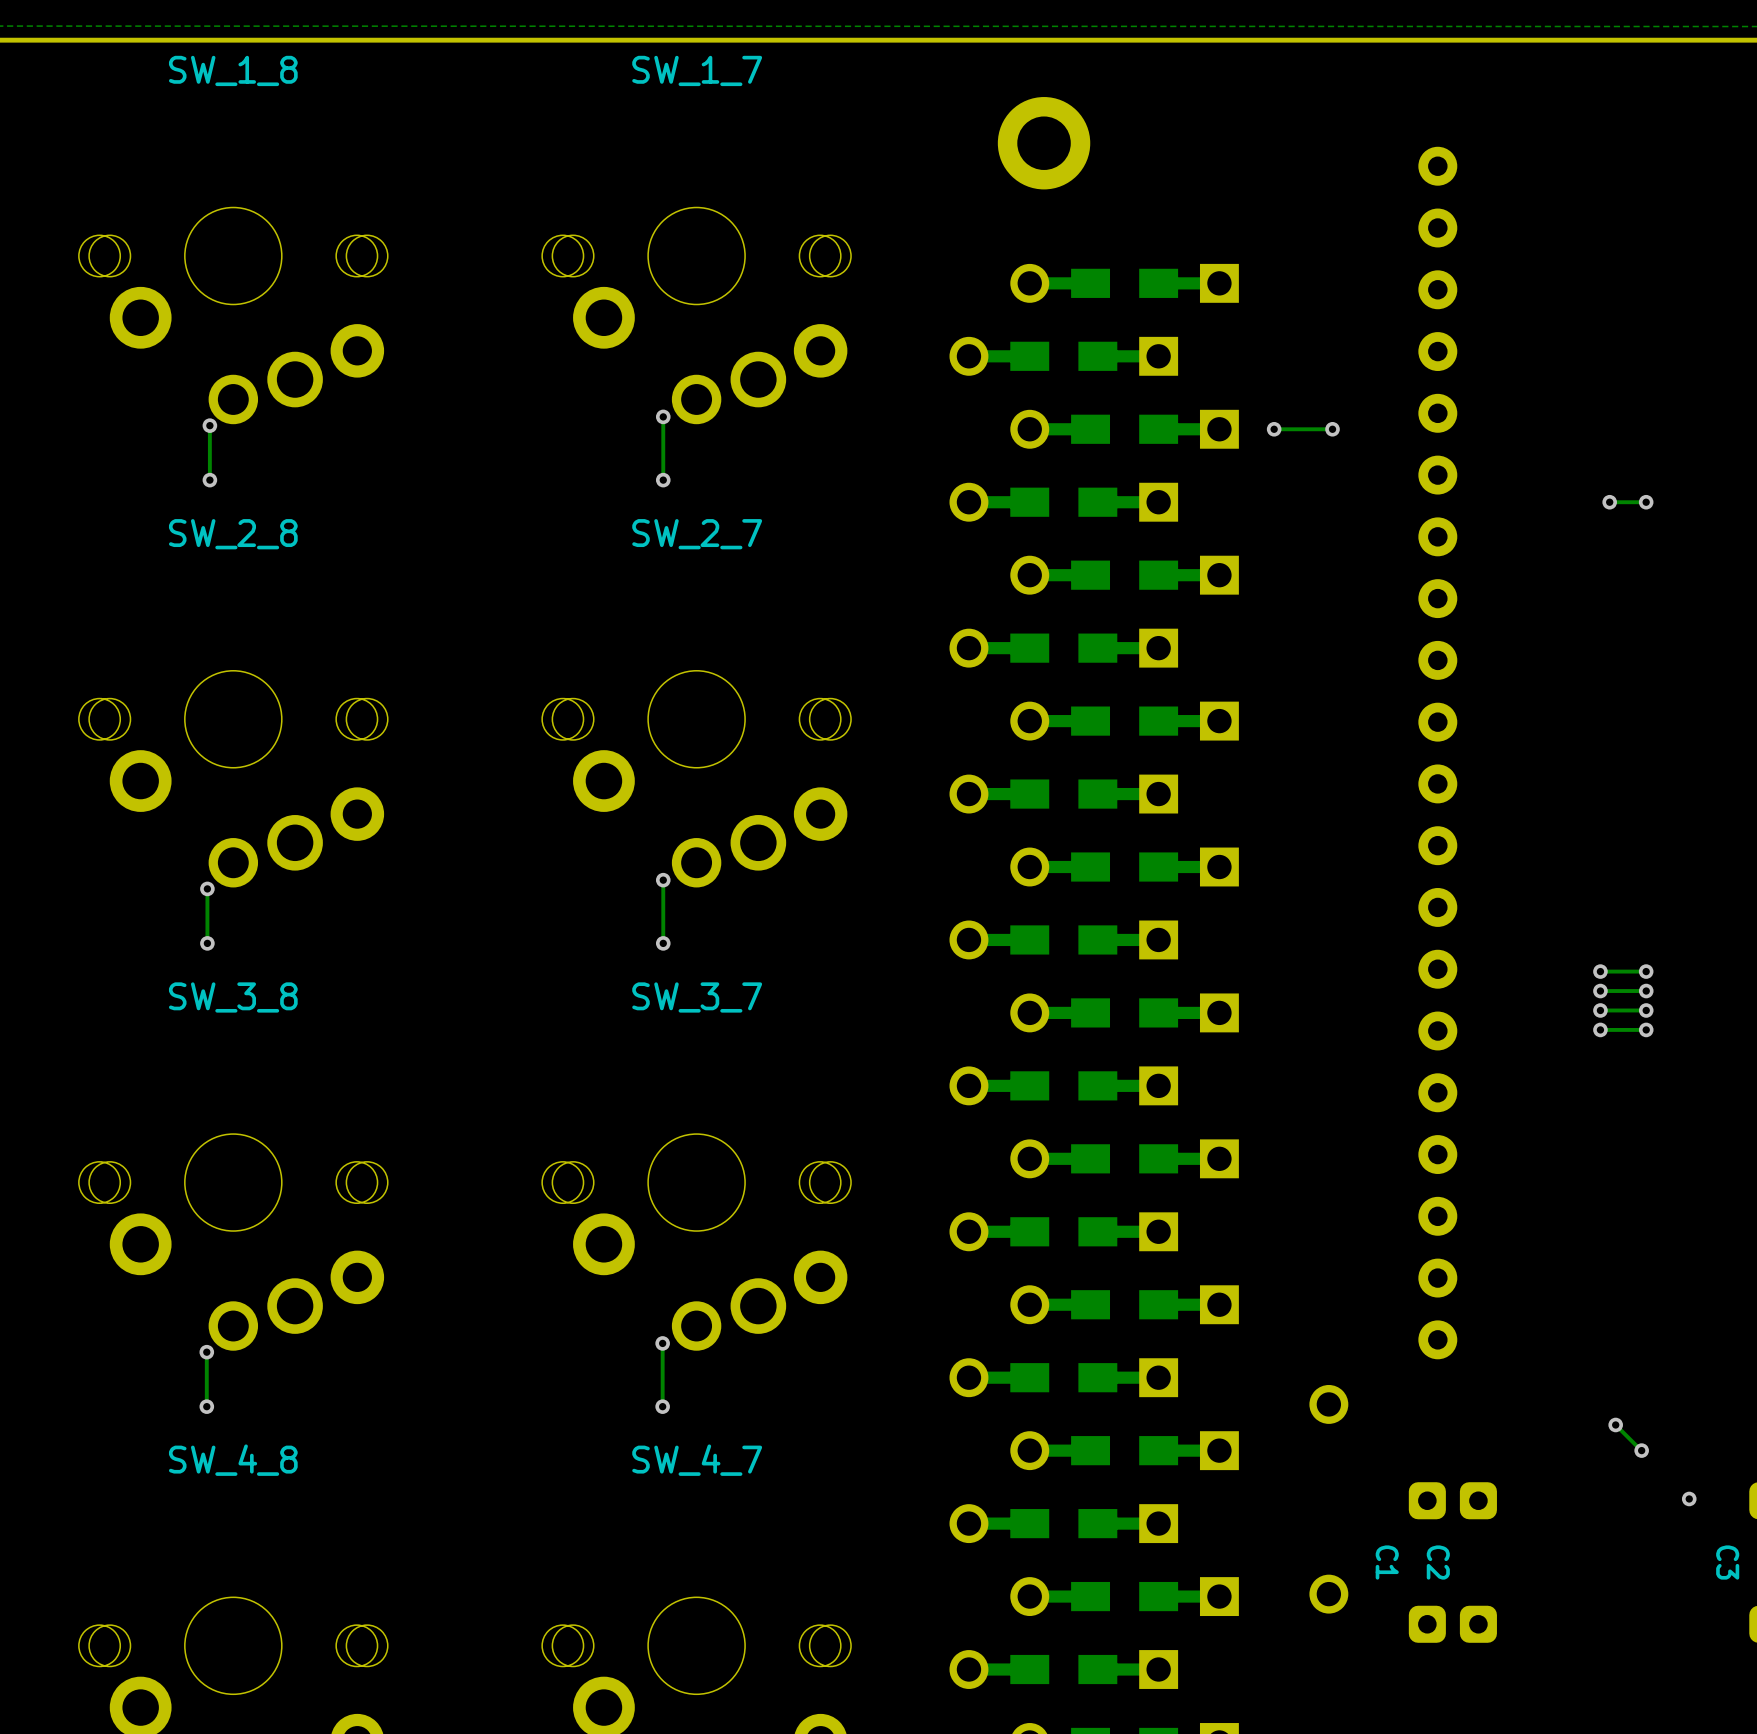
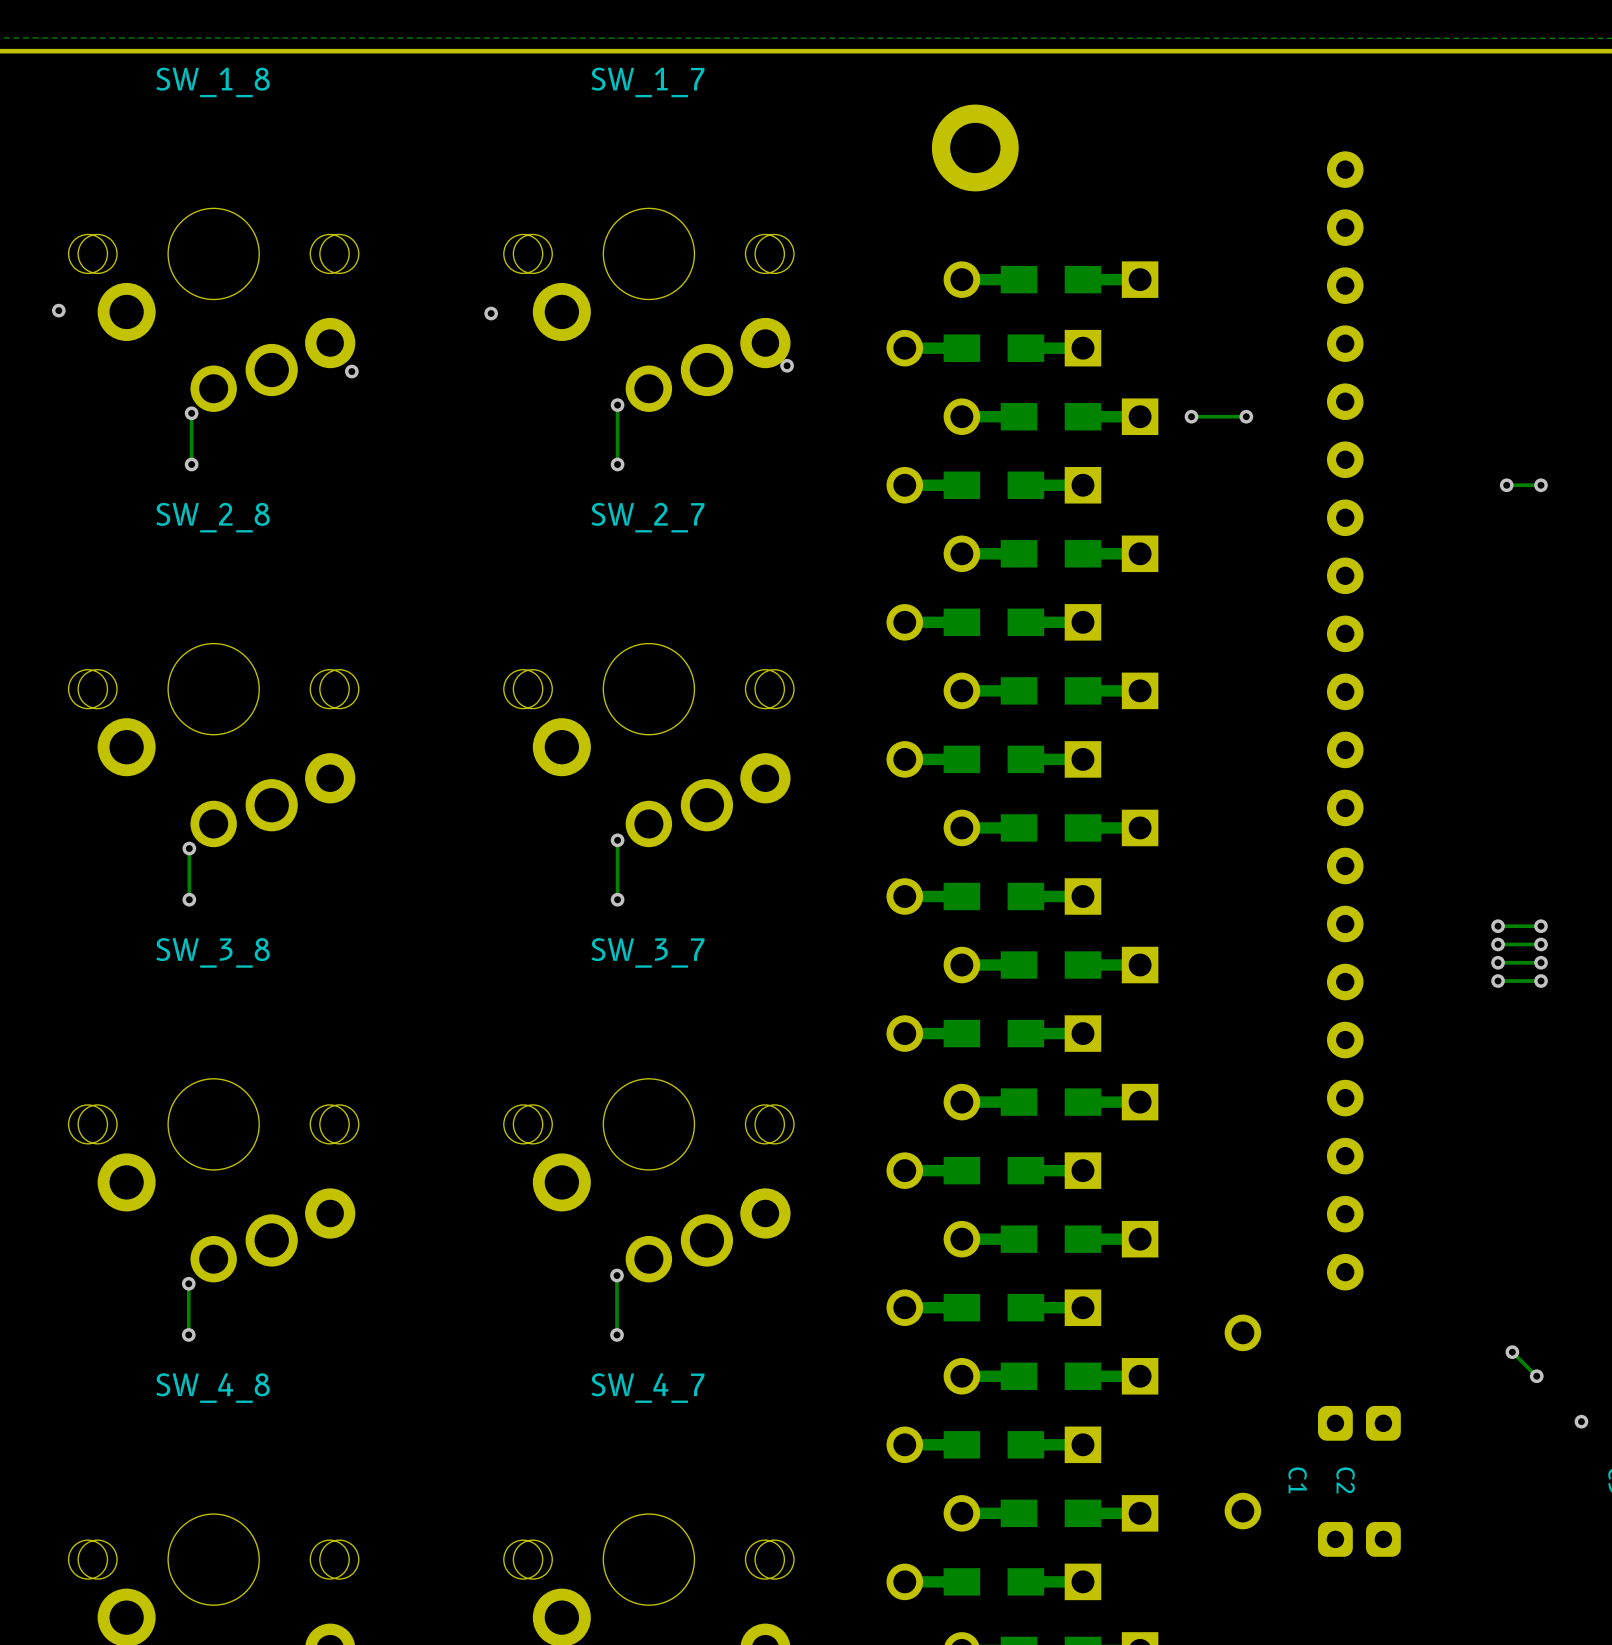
via: none -> (58, 310)
via: none -> (491, 313)
via: none -> (787, 365)
via: none -> (351, 371)

